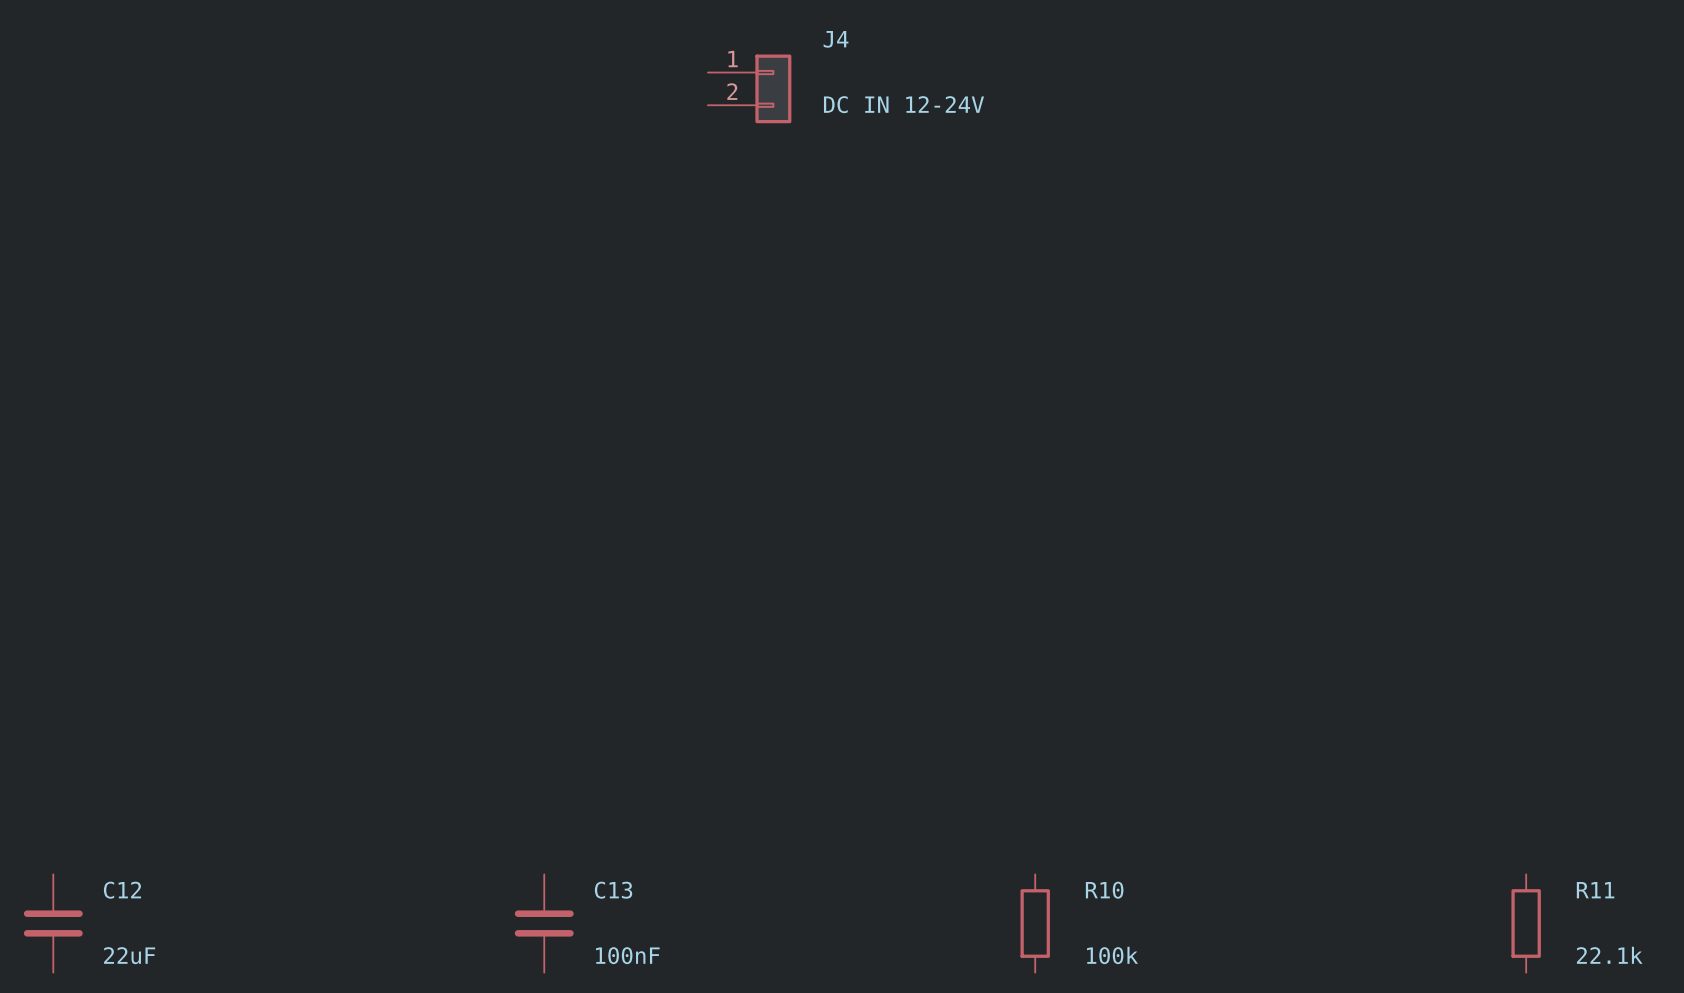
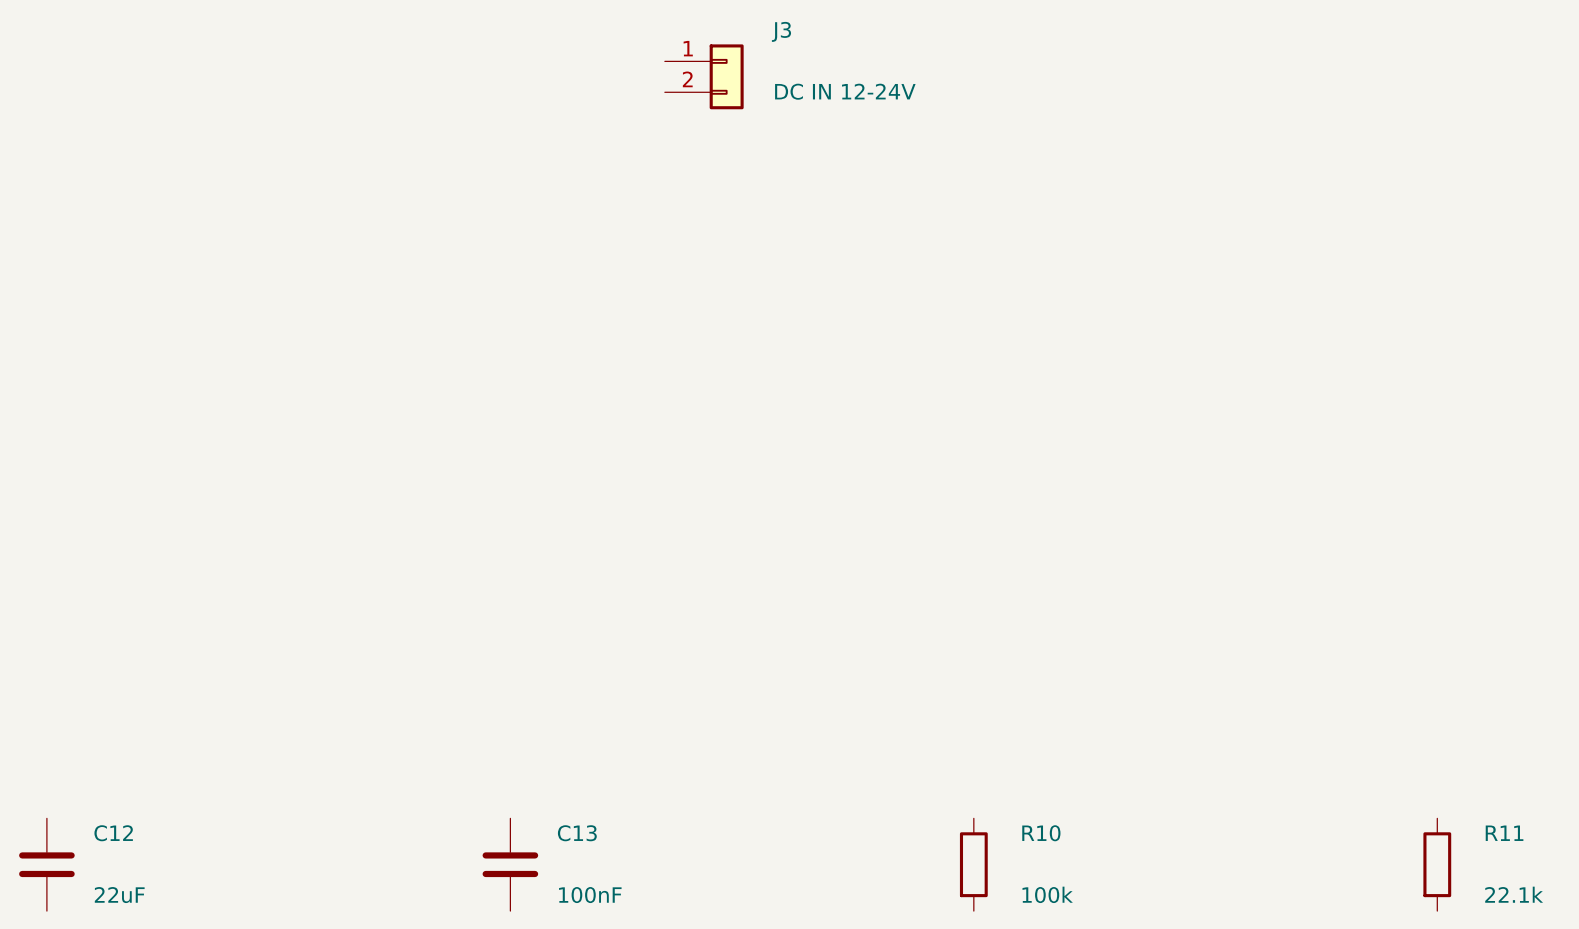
J4 name: J4 (836, 39) -> J3 (781, 31)

